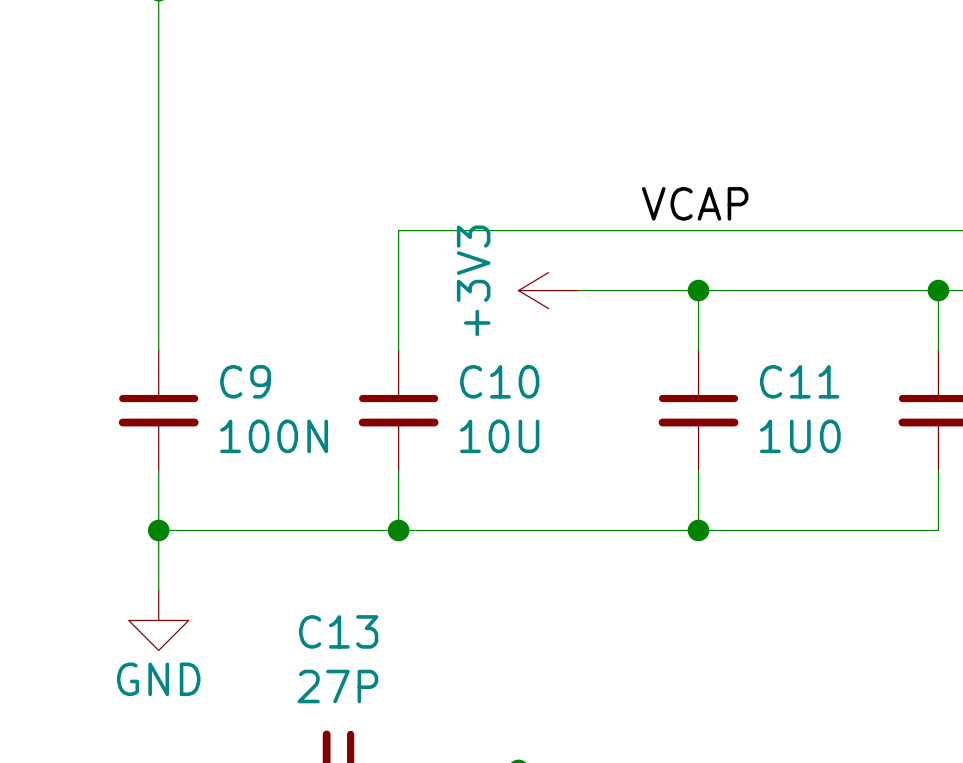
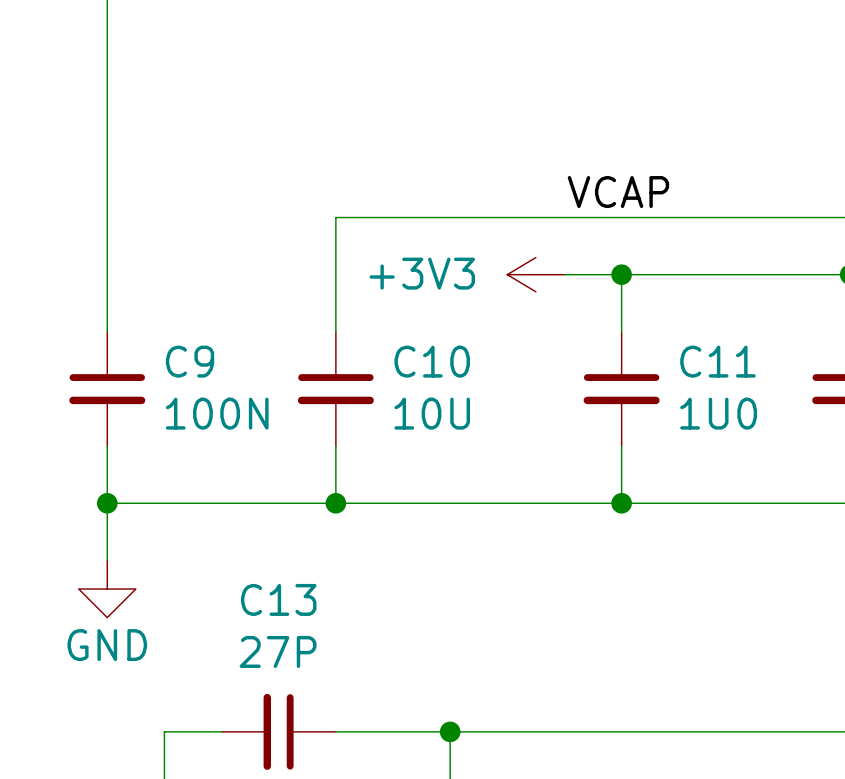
power symbol text rotation: 0° (473, 280) -> 90° clockwise (422, 273)
power symbol position: +3V3 (548, 290) -> +3V3 (535, 274)

